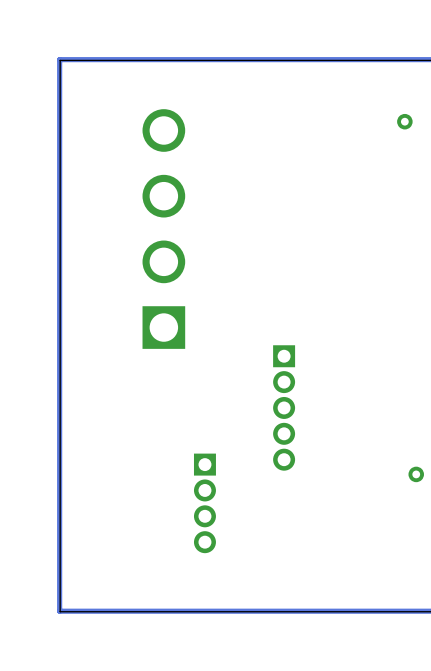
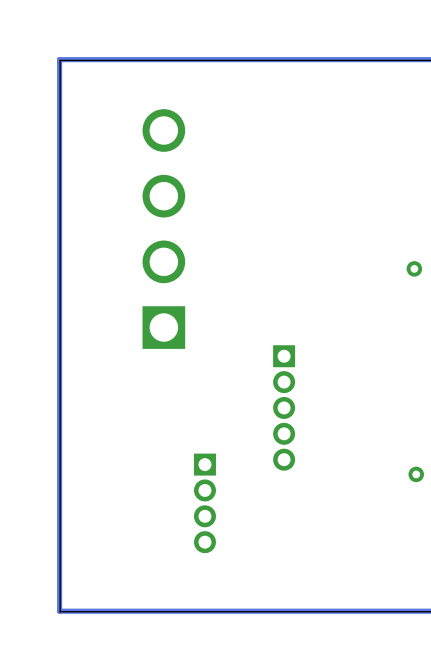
via: (404, 121) -> none
via: none -> (414, 268)

